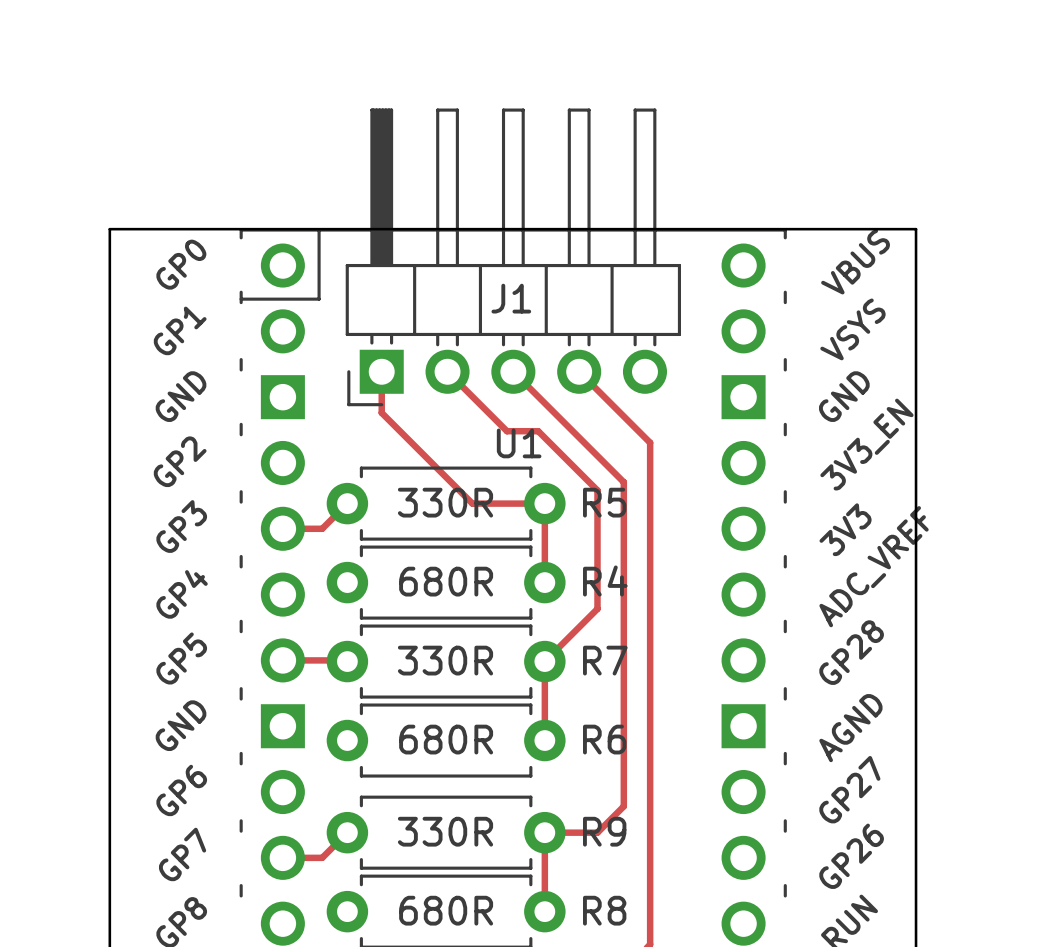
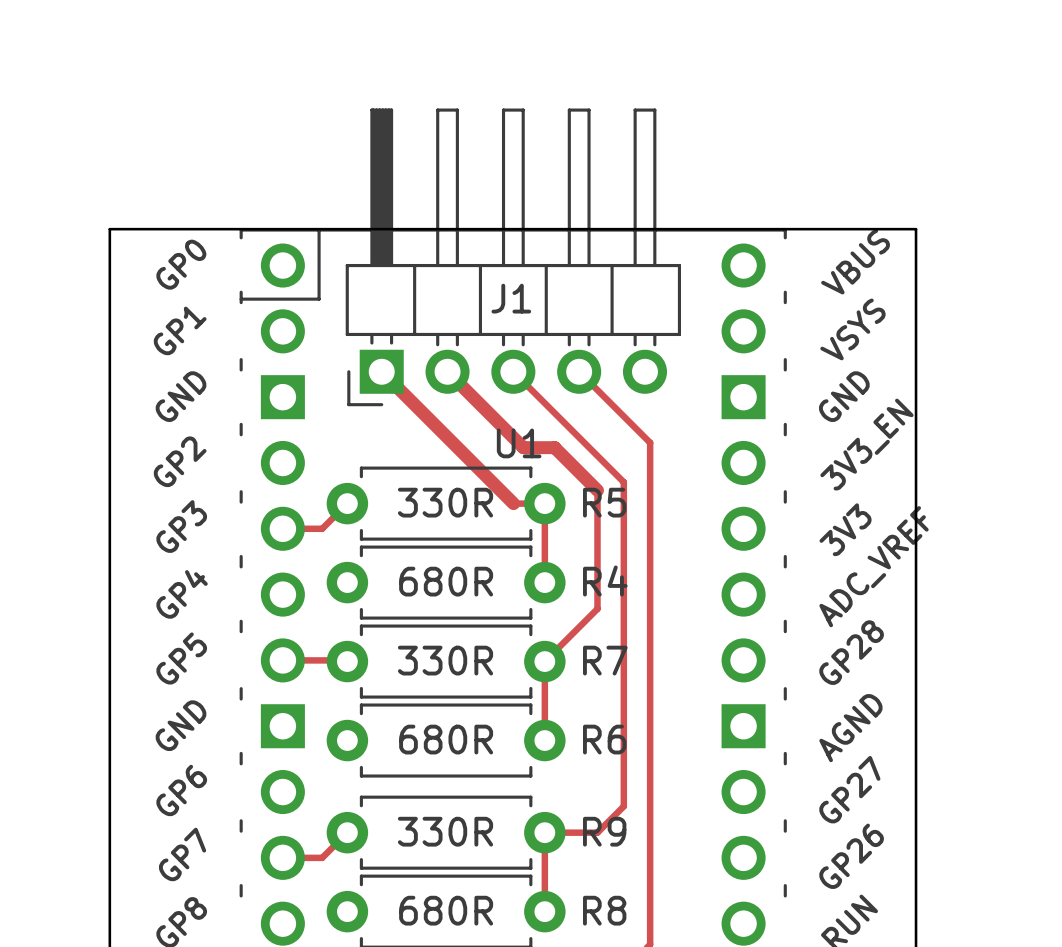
track: (381, 371) (381, 412) (472, 503) (513, 503) -> (381, 371) (513, 503)
track width: thin (447, 371) (506, 431) -> thick (447, 371) (506, 431)
track: (506, 431) (538, 431) (554, 447) -> (506, 431) (523, 447) (554, 447)
track width: thin (554, 447) (597, 490) -> thick (554, 447) (597, 490)

